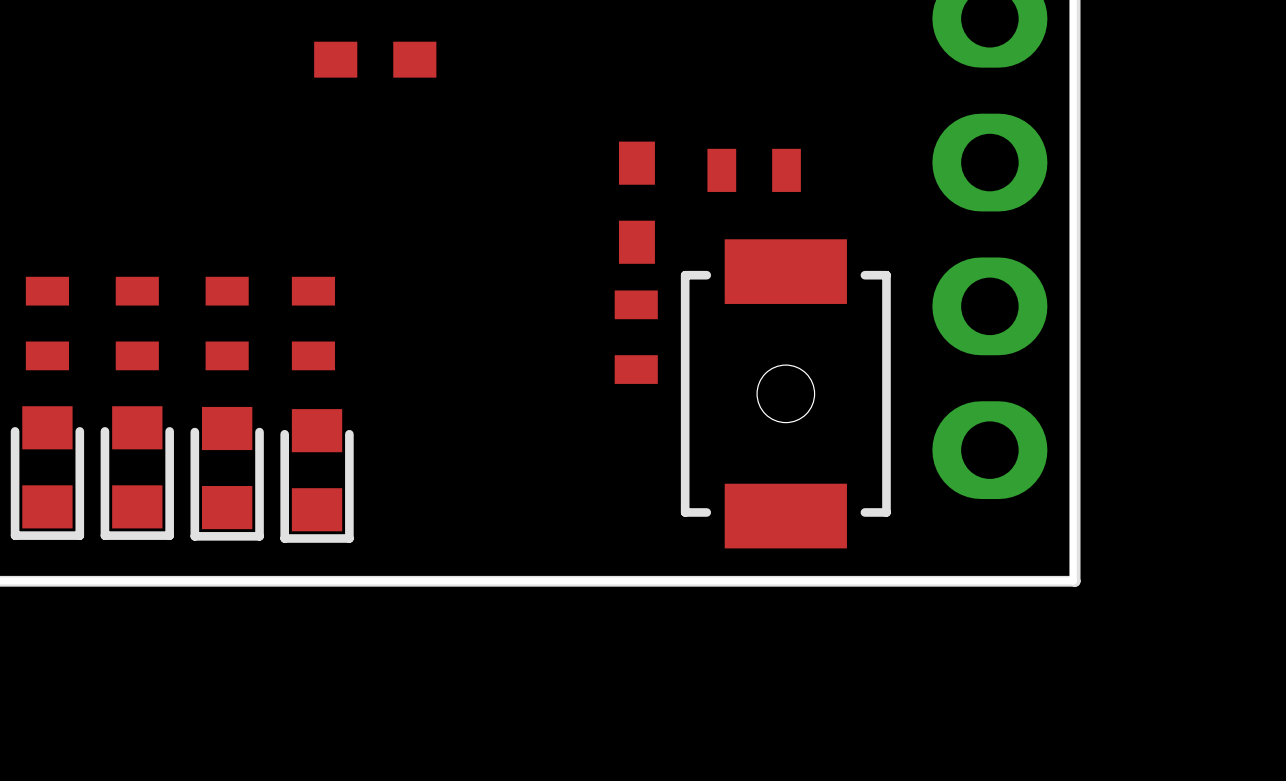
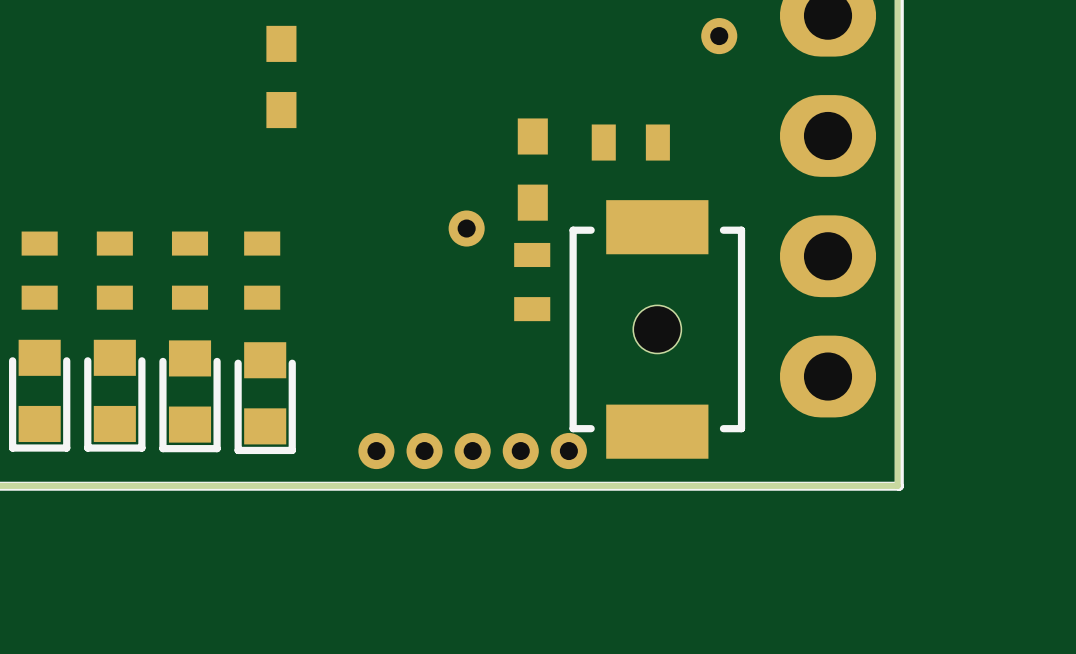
part: none -> (719, 36)
part rotation: 0° (375, 59) -> 90° clockwise (281, 76)
part: none -> (466, 228)
part: none -> (376, 451)
part: none -> (424, 451)
part: none -> (472, 451)
part: none -> (520, 451)
part: none -> (568, 451)

